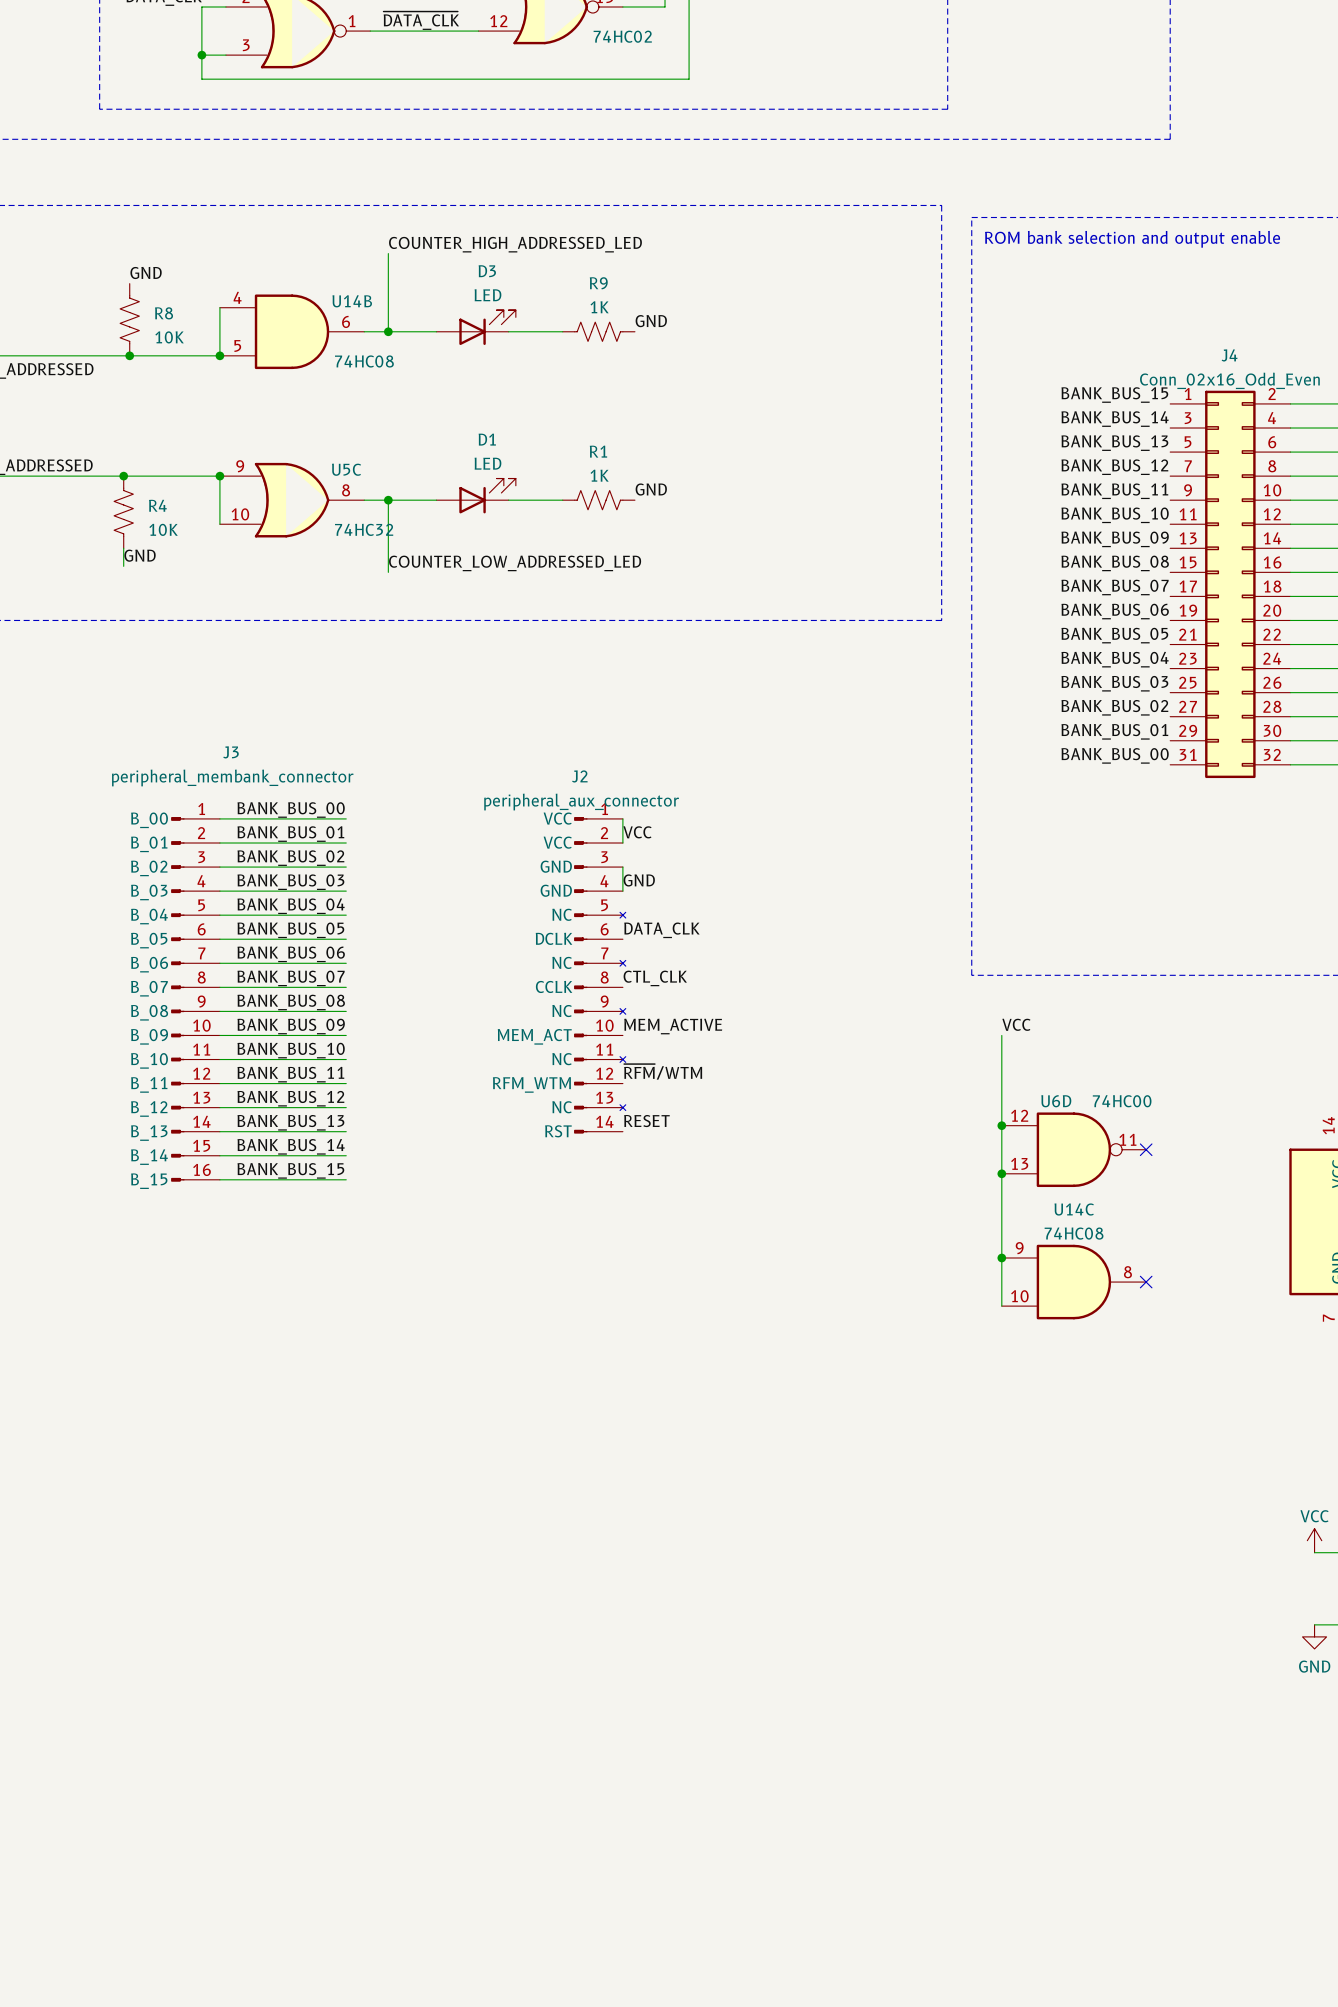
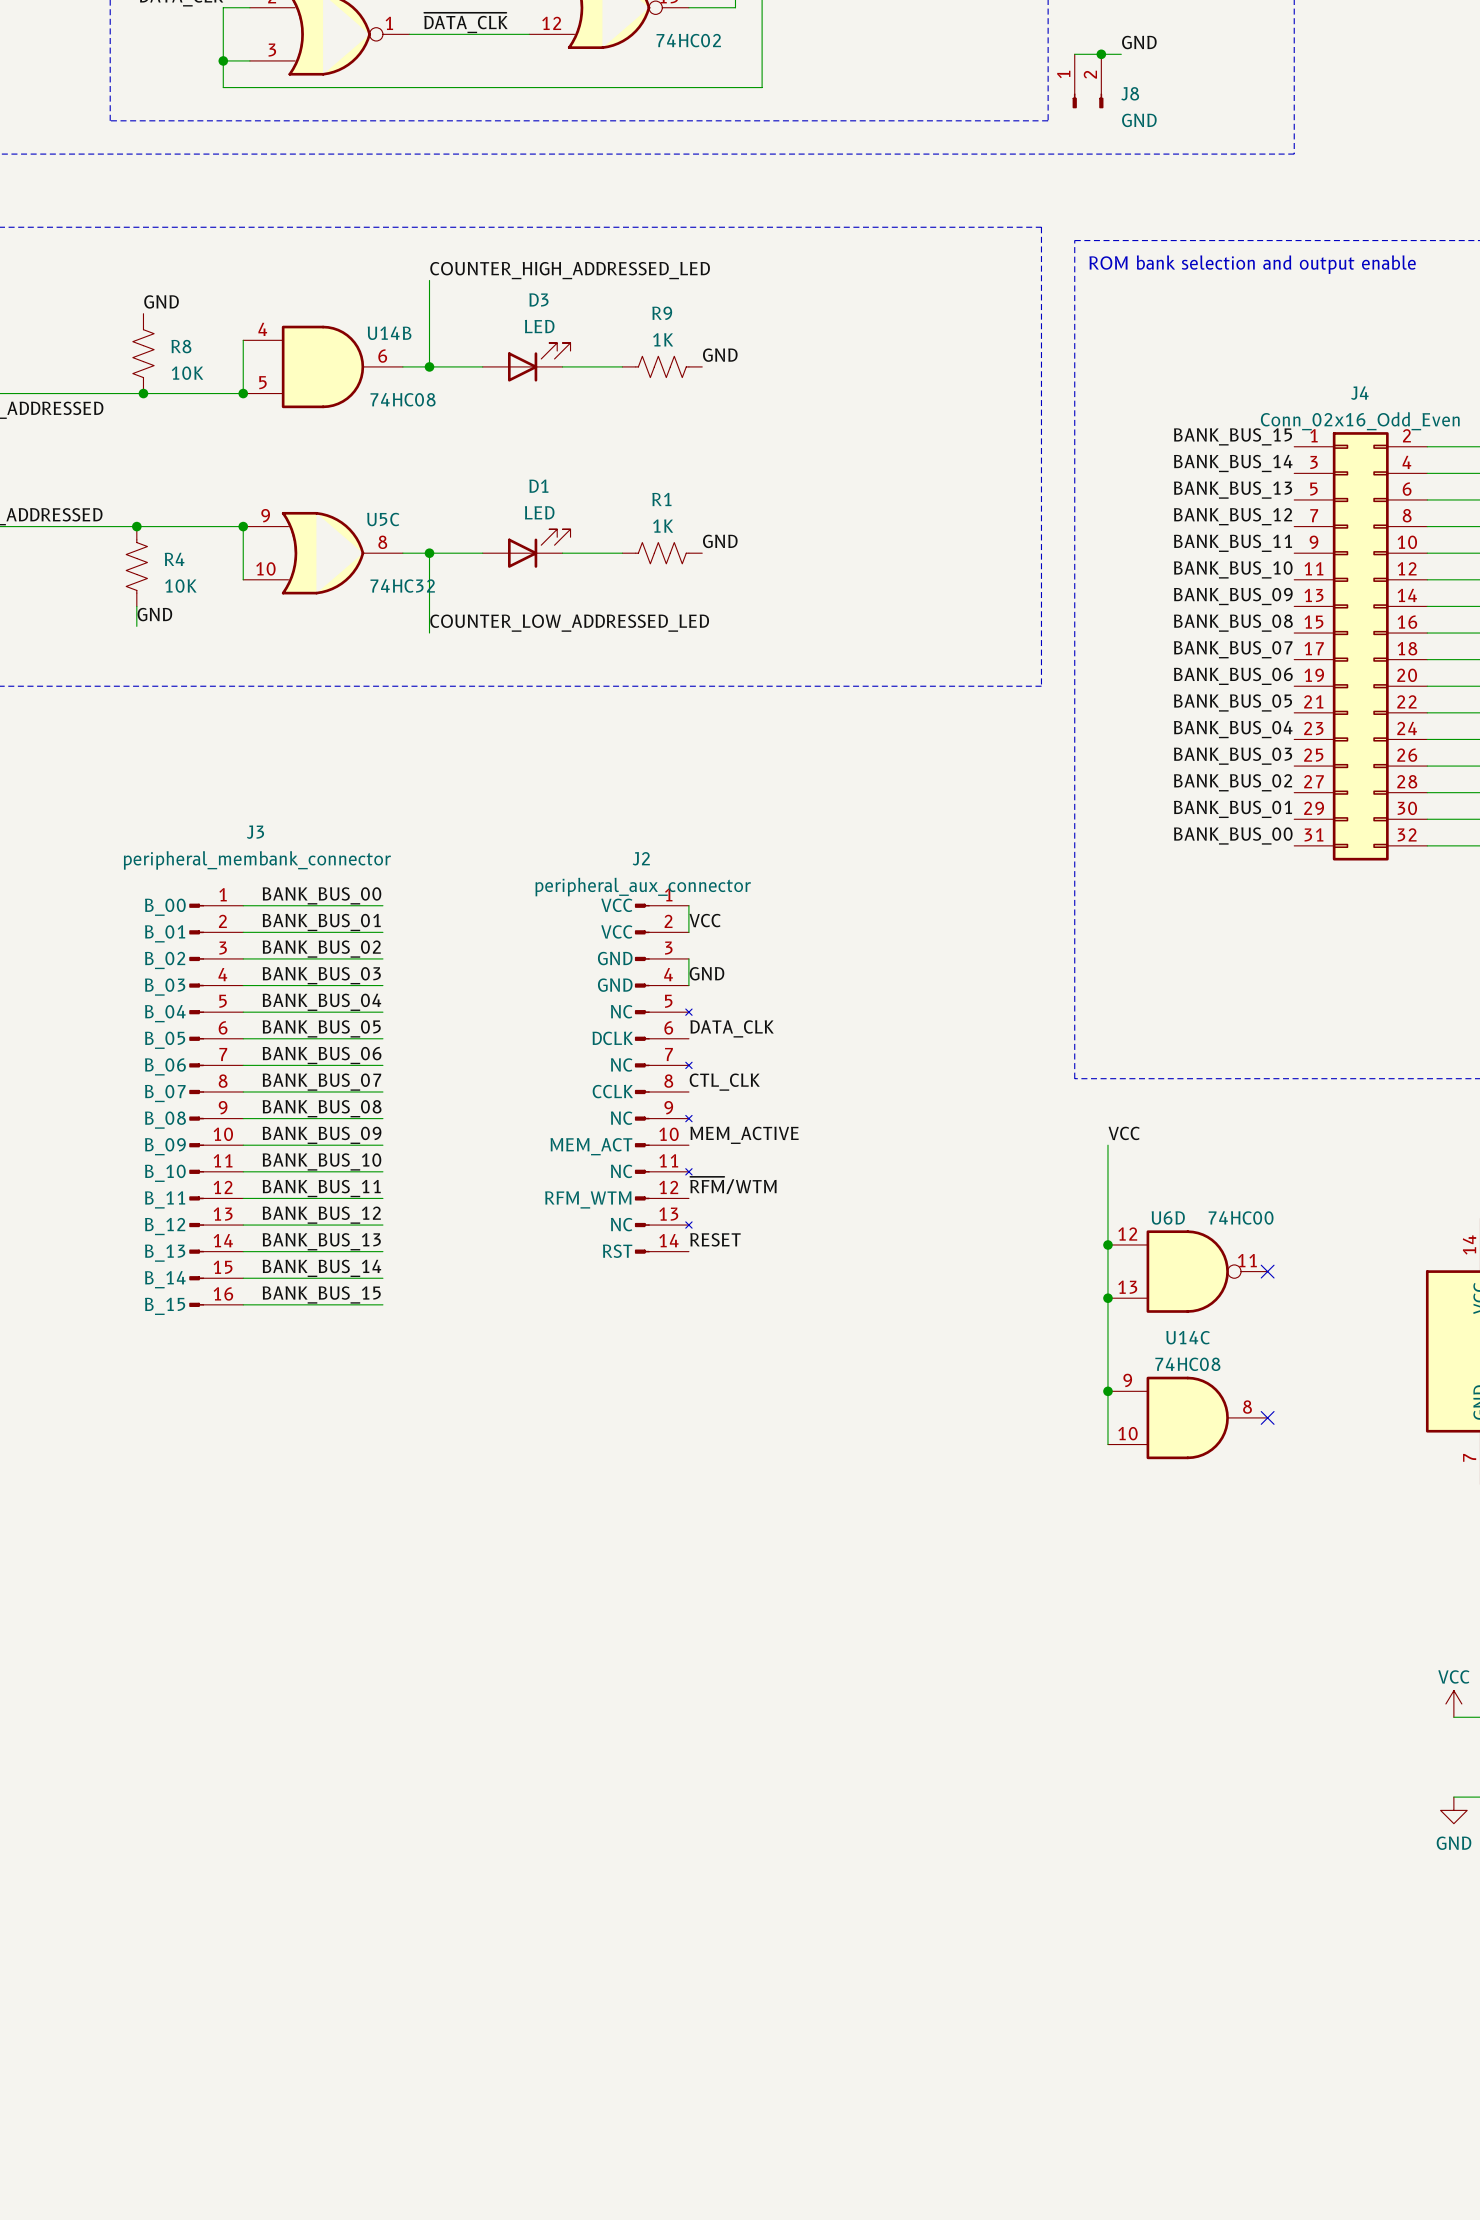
label: none -> GND (1139, 42)
wire: none -> (1074, 54) (1121, 54)
junction: none -> (1101, 54)
J8: none -> GND (1088, 81)

